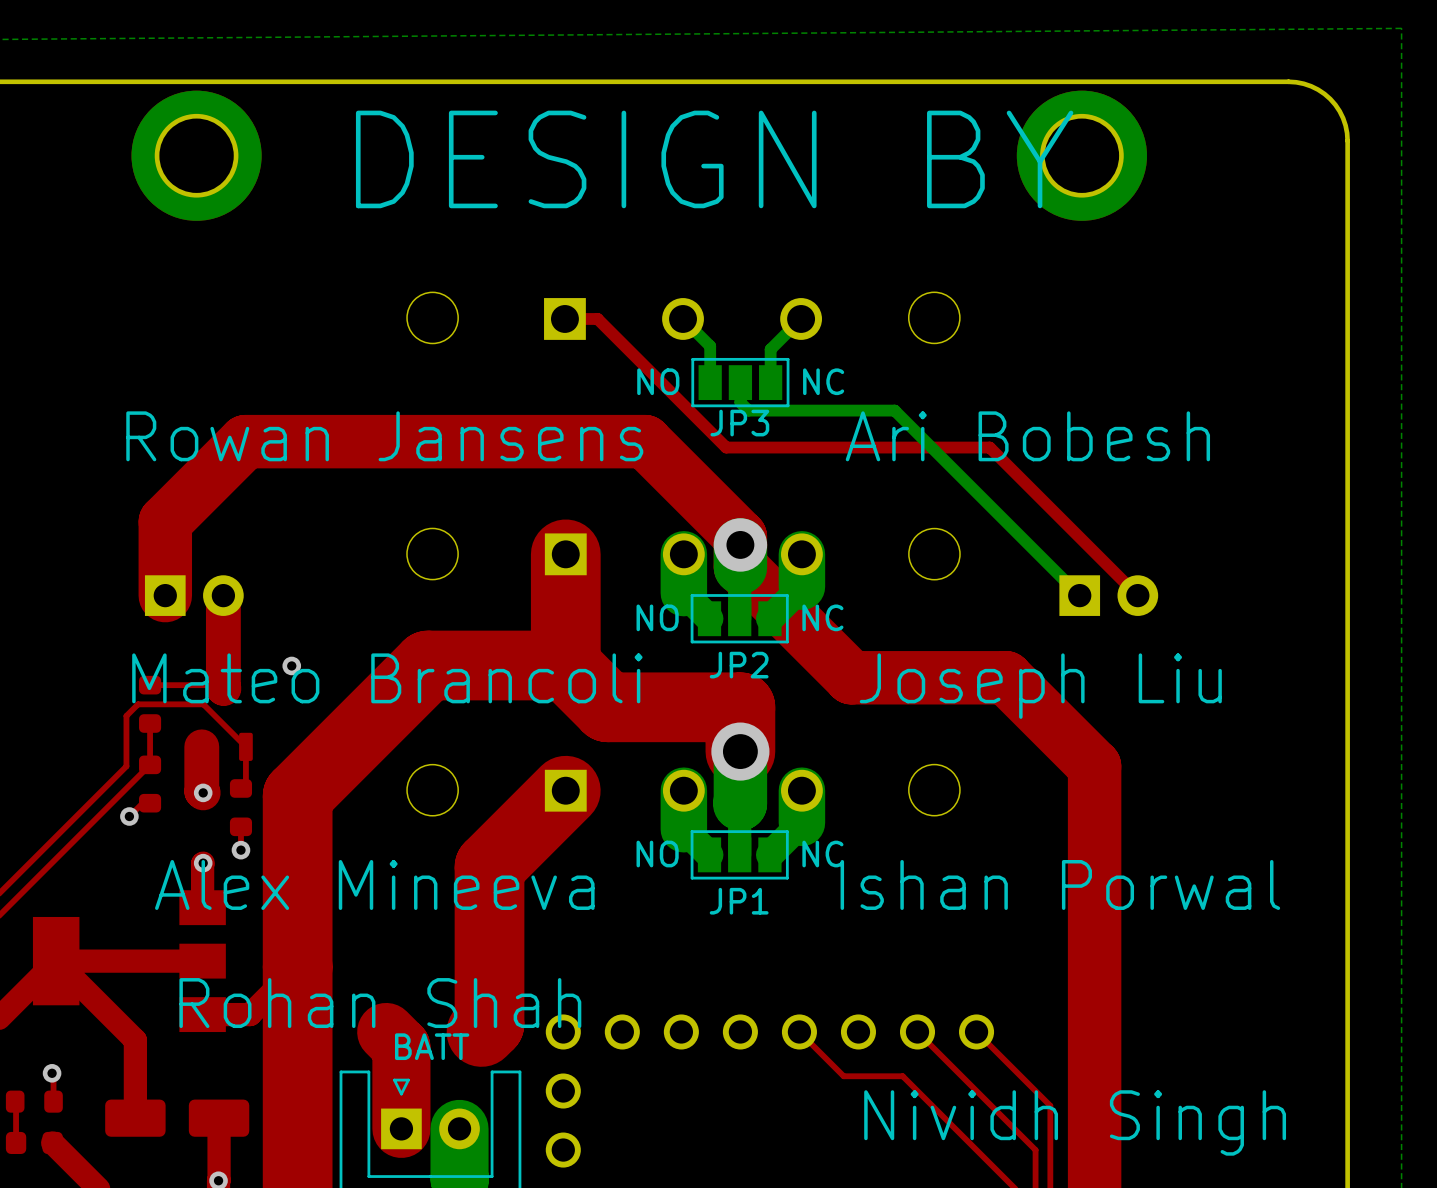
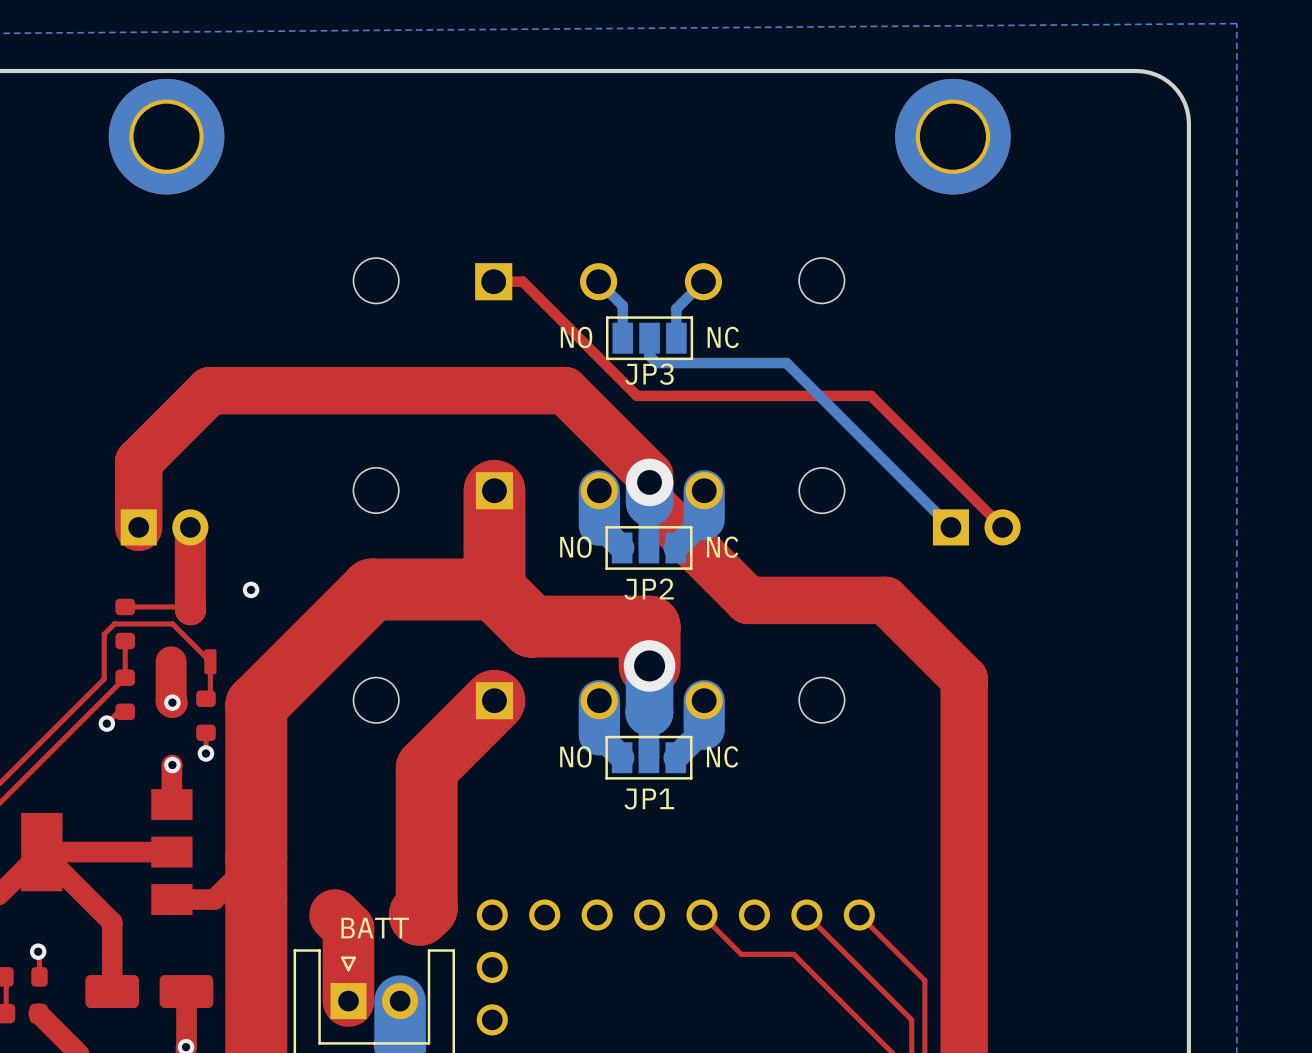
text: DESIGN BY (714, 159) -> none
text: Rowan Jansens (384, 436) -> none
text: Ari Bobesh (1027, 436) -> none
text: Mateo Brancoli (387, 678) -> none
text: Joseph Liu (1040, 686) -> none
text: Alex Mineeva (374, 884) -> none
text: Ishan Porwal (1060, 884) -> none
text: Rohan Shah (380, 1003) -> none
text: Nividh Singh (1075, 1122) -> none

